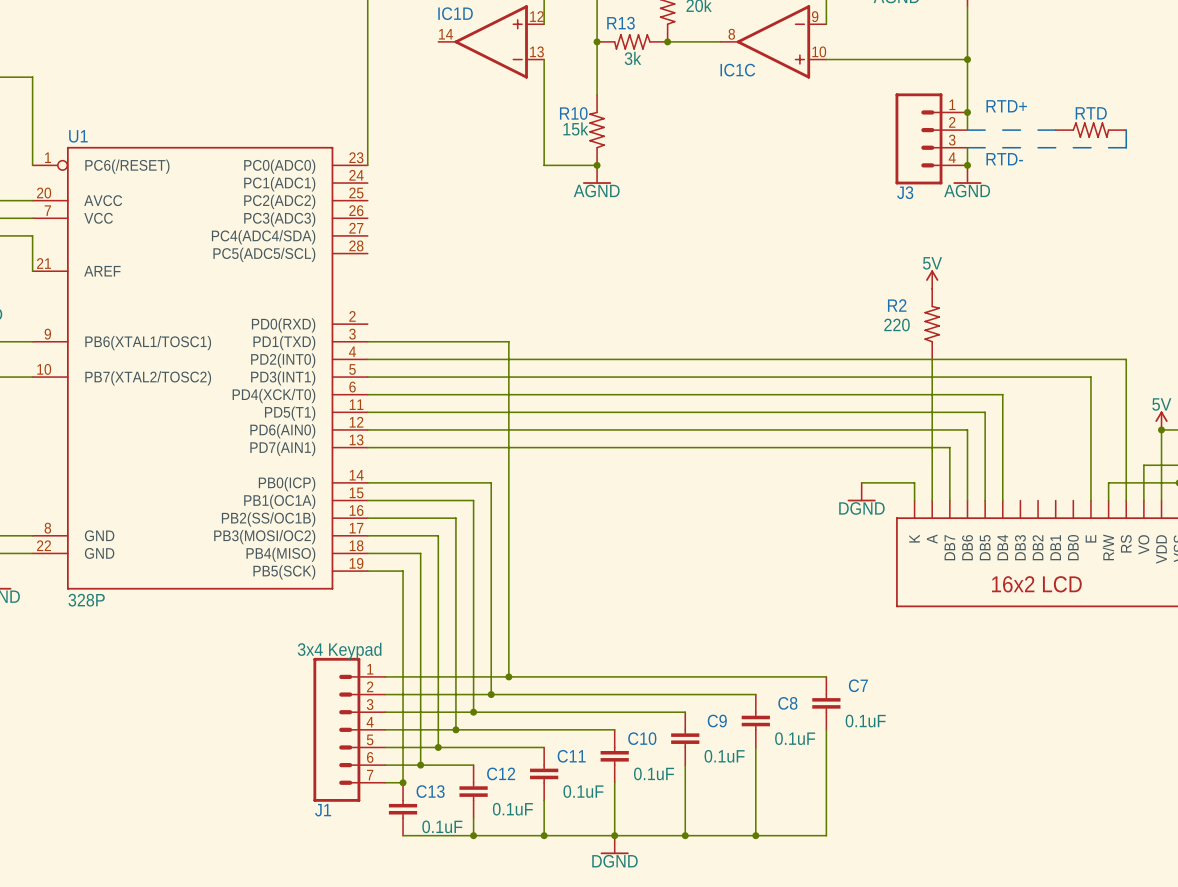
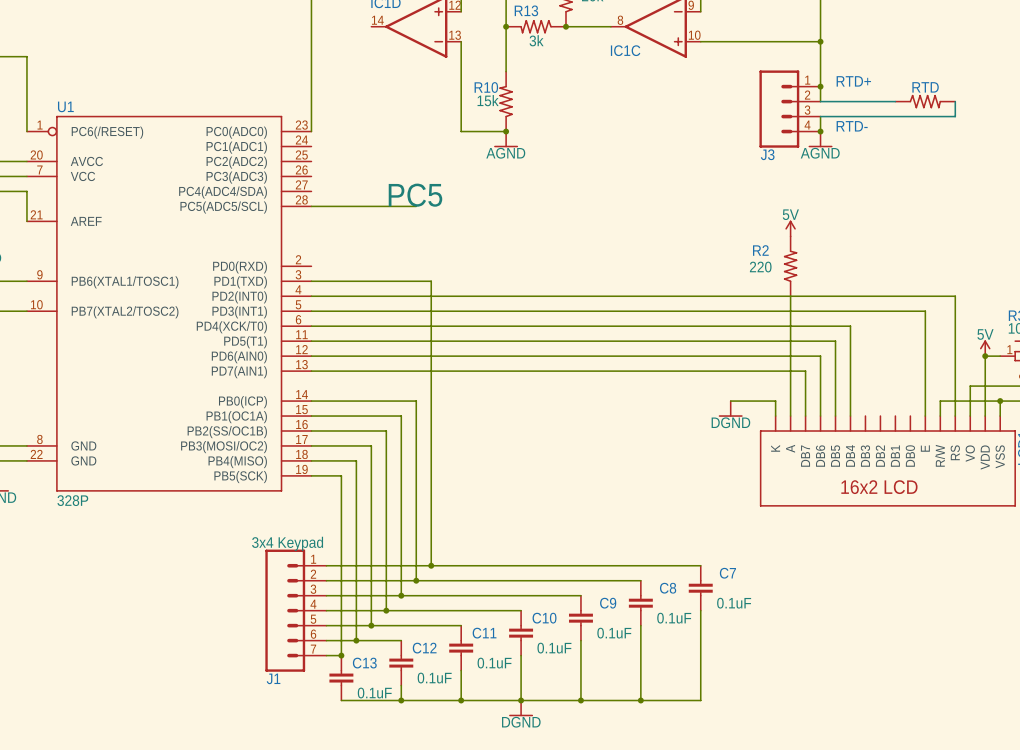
line: (967, 130) (985, 130) -> none
line: none -> (820, 101) (895, 101)
line: (1002, 130) (1020, 130) -> none
line: (1038, 130) (1055, 130) -> none
line: (1126, 130) (1126, 147) (1108, 147) -> none
line: none -> (955, 101) (955, 116) (820, 116)
line: (967, 147) (985, 147) -> none
line: (1002, 147) (1020, 147) -> none
line: (1038, 147) (1055, 147) -> none
line: (1073, 147) (1090, 147) -> none
text: none -> PC5 (415, 195)
wire: none -> (311, 206) (416, 206)

